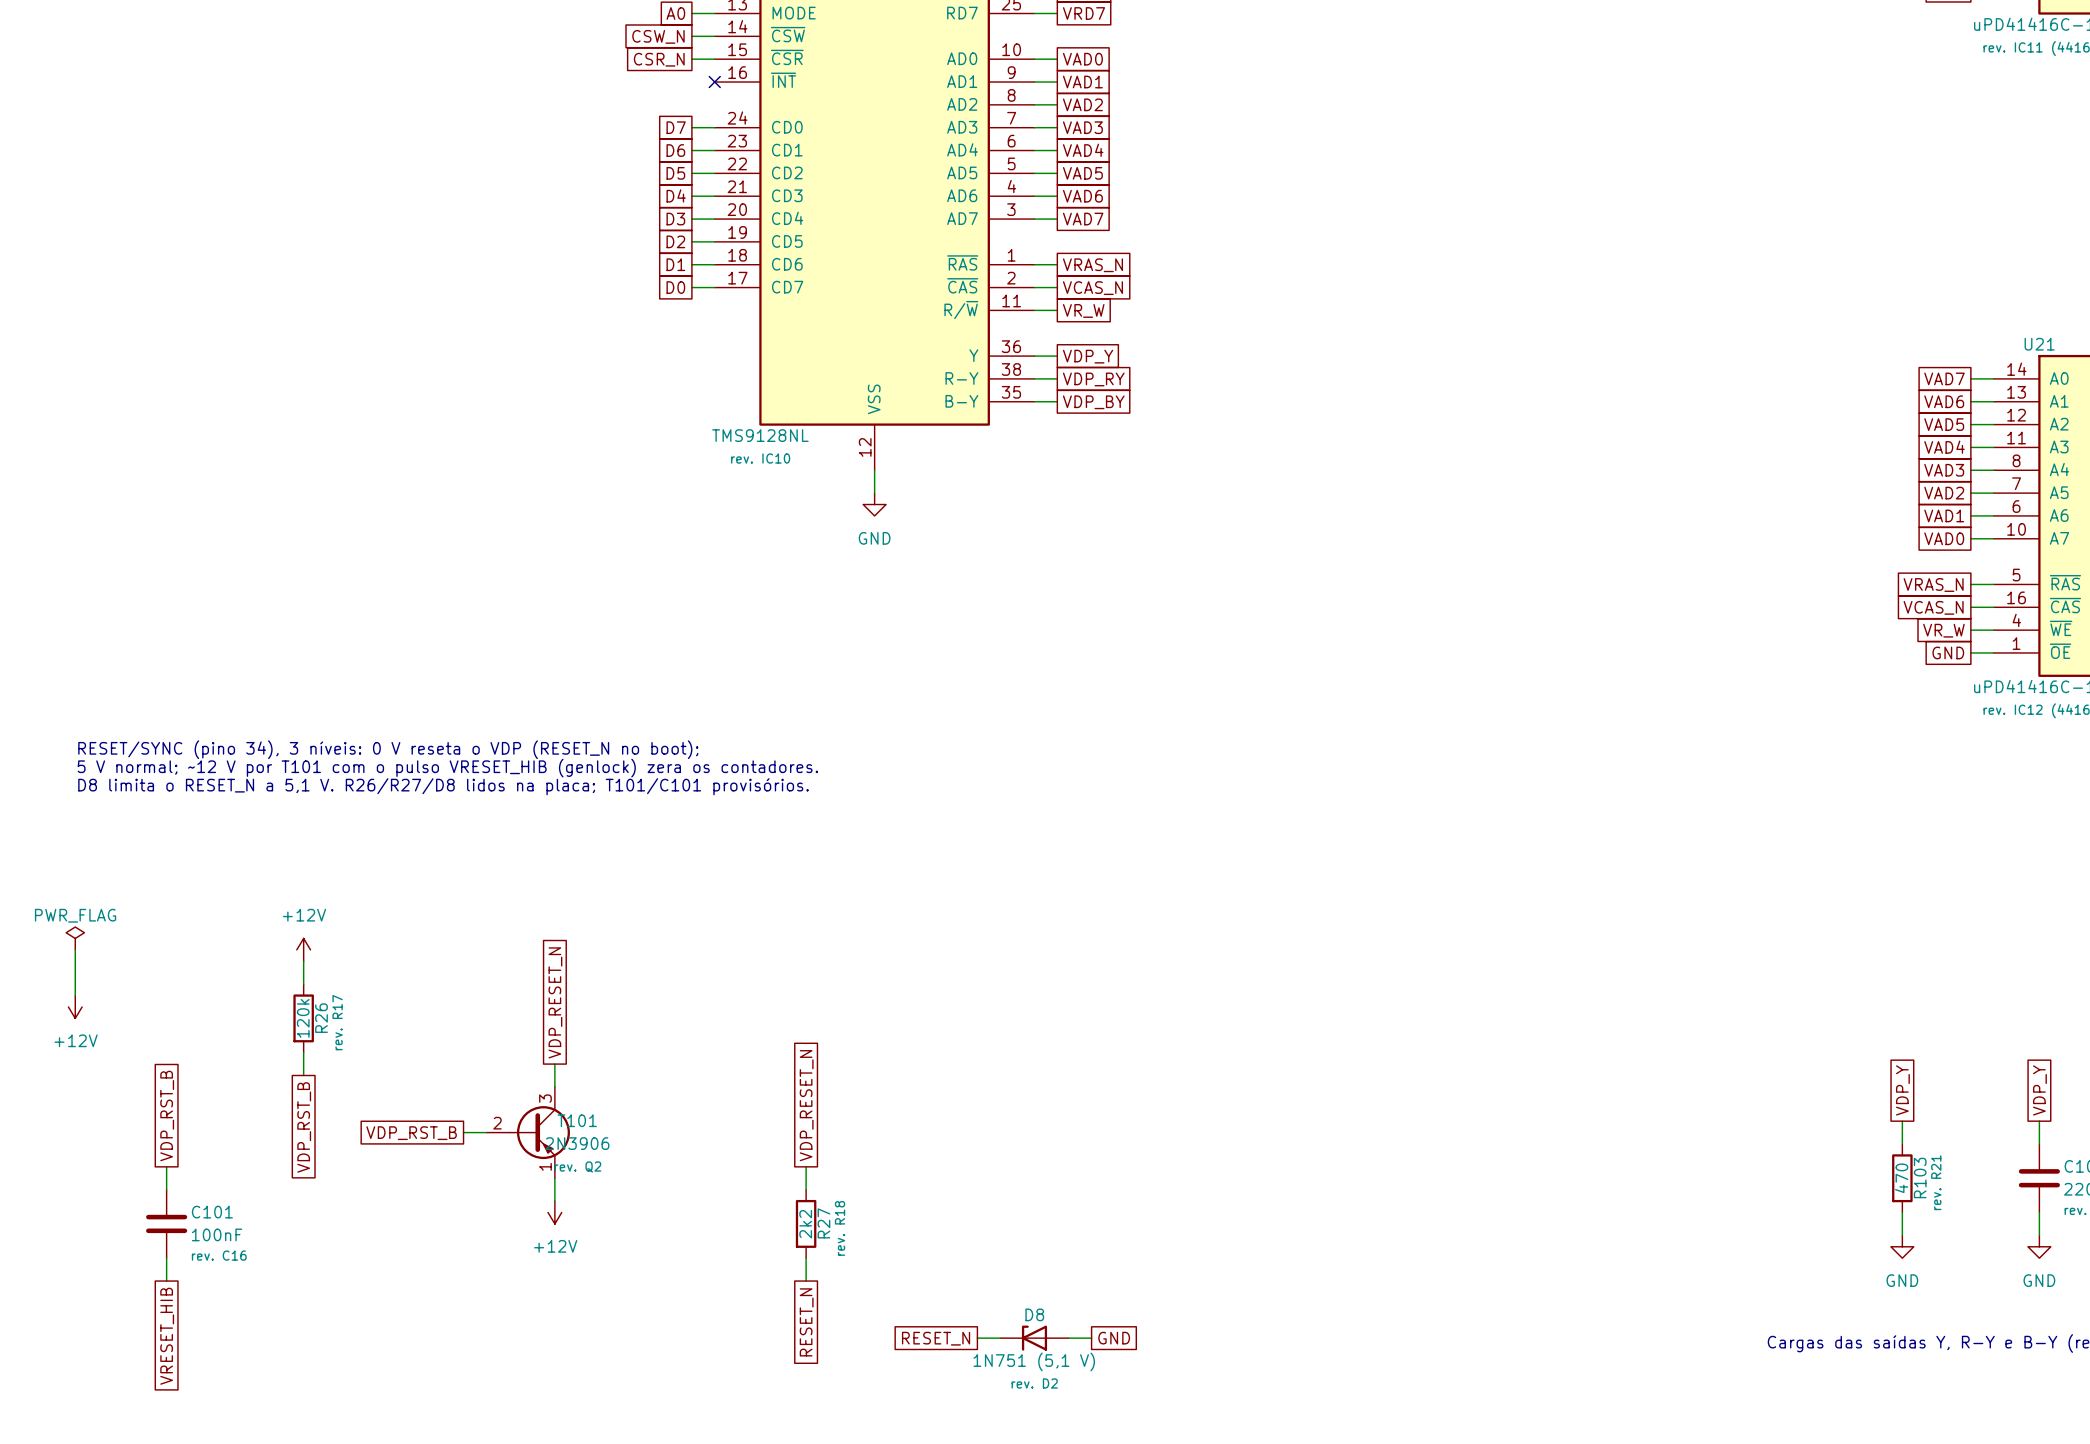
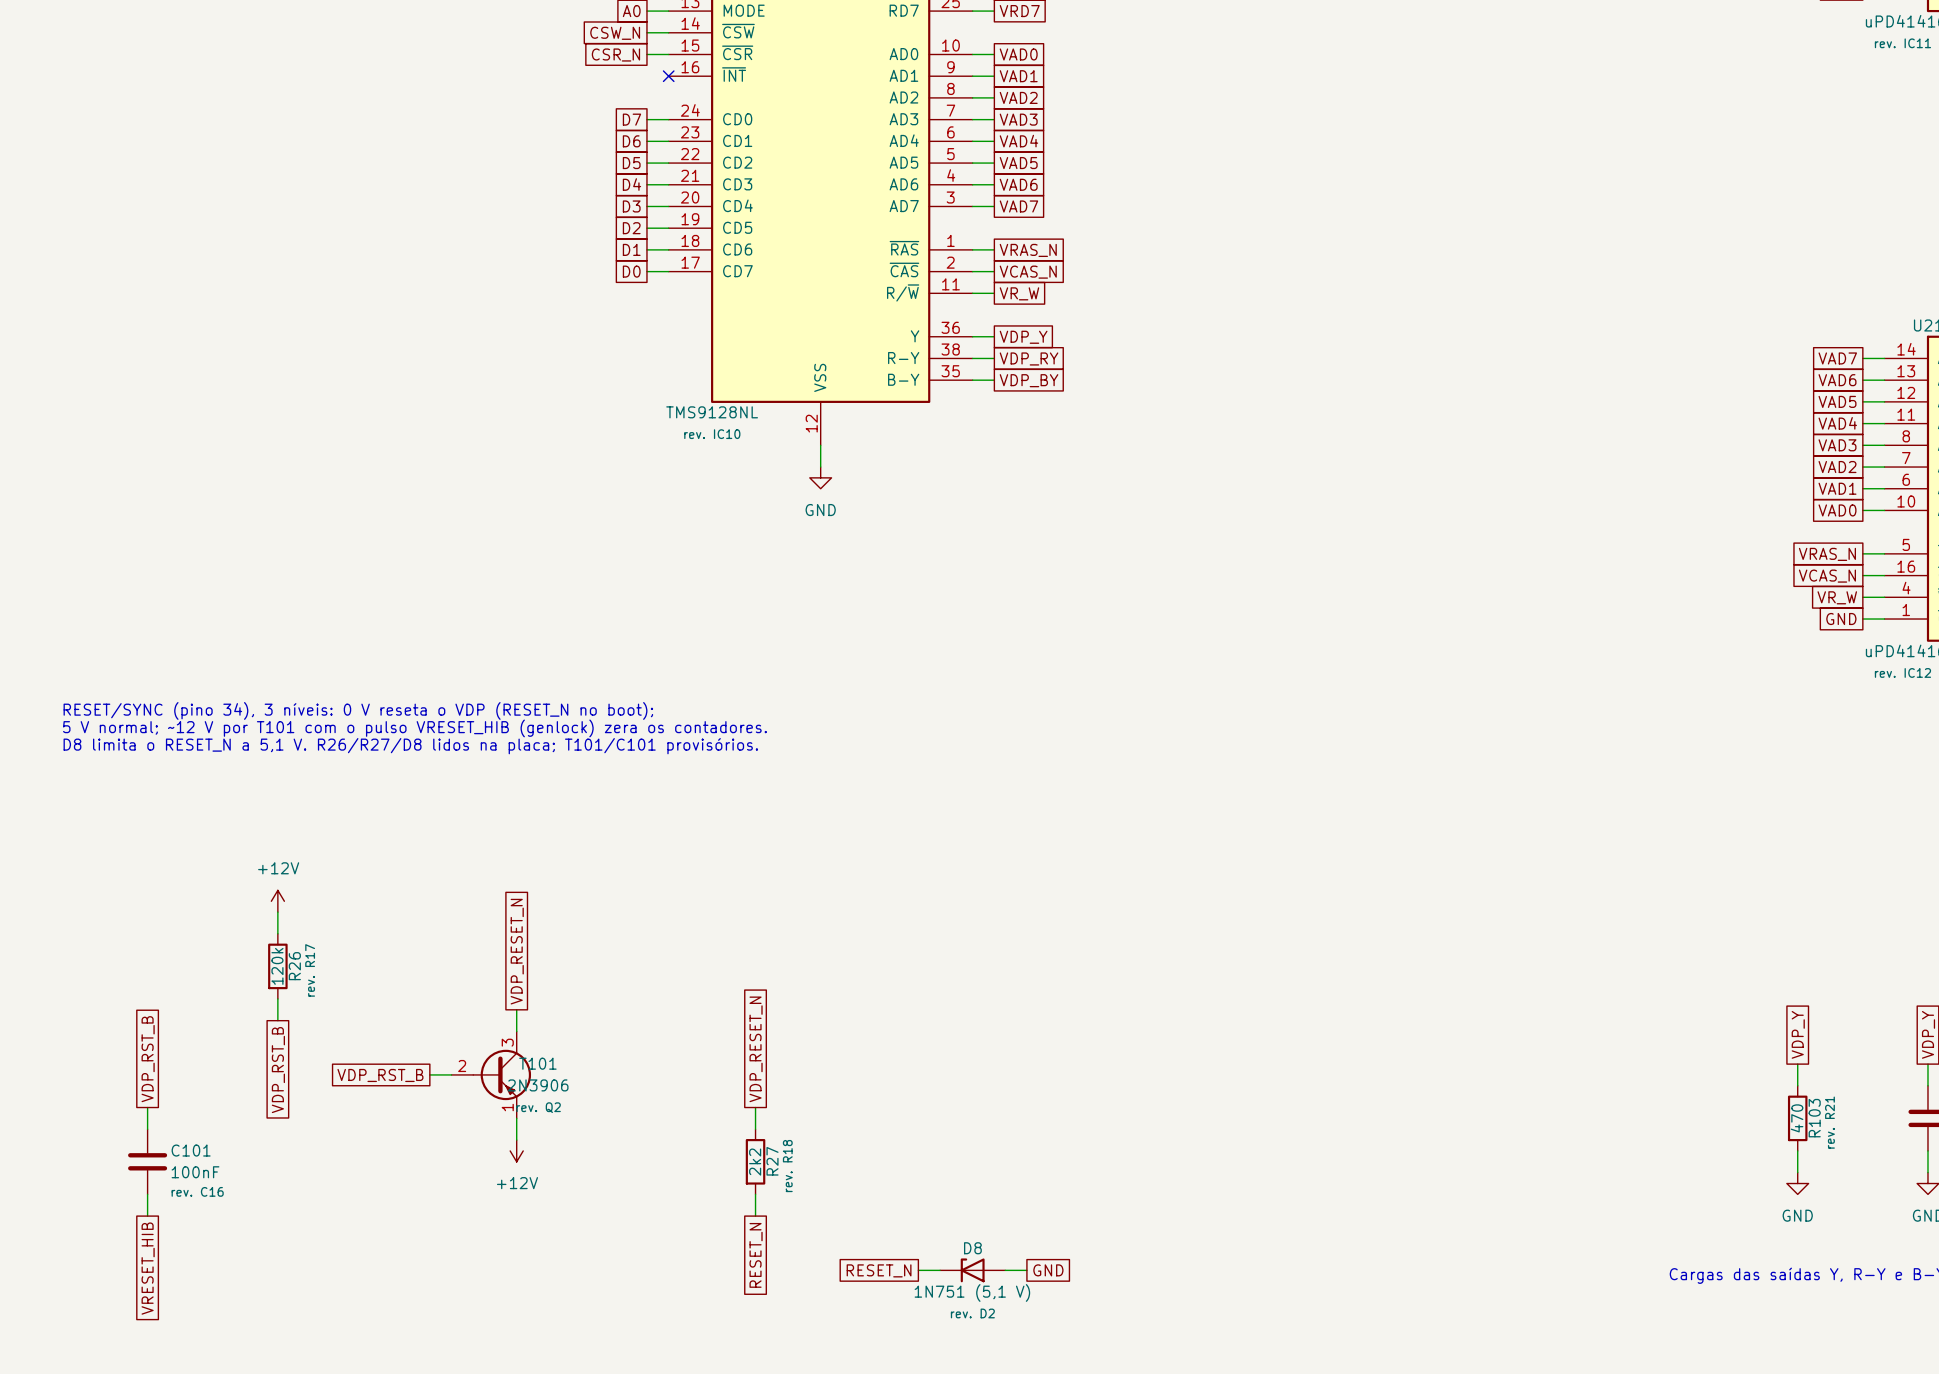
power symbol: PWR_FLAG (75, 938) -> none
wire: (75, 949) (75, 995) -> none
power symbol: +12V (75, 1006) -> none

